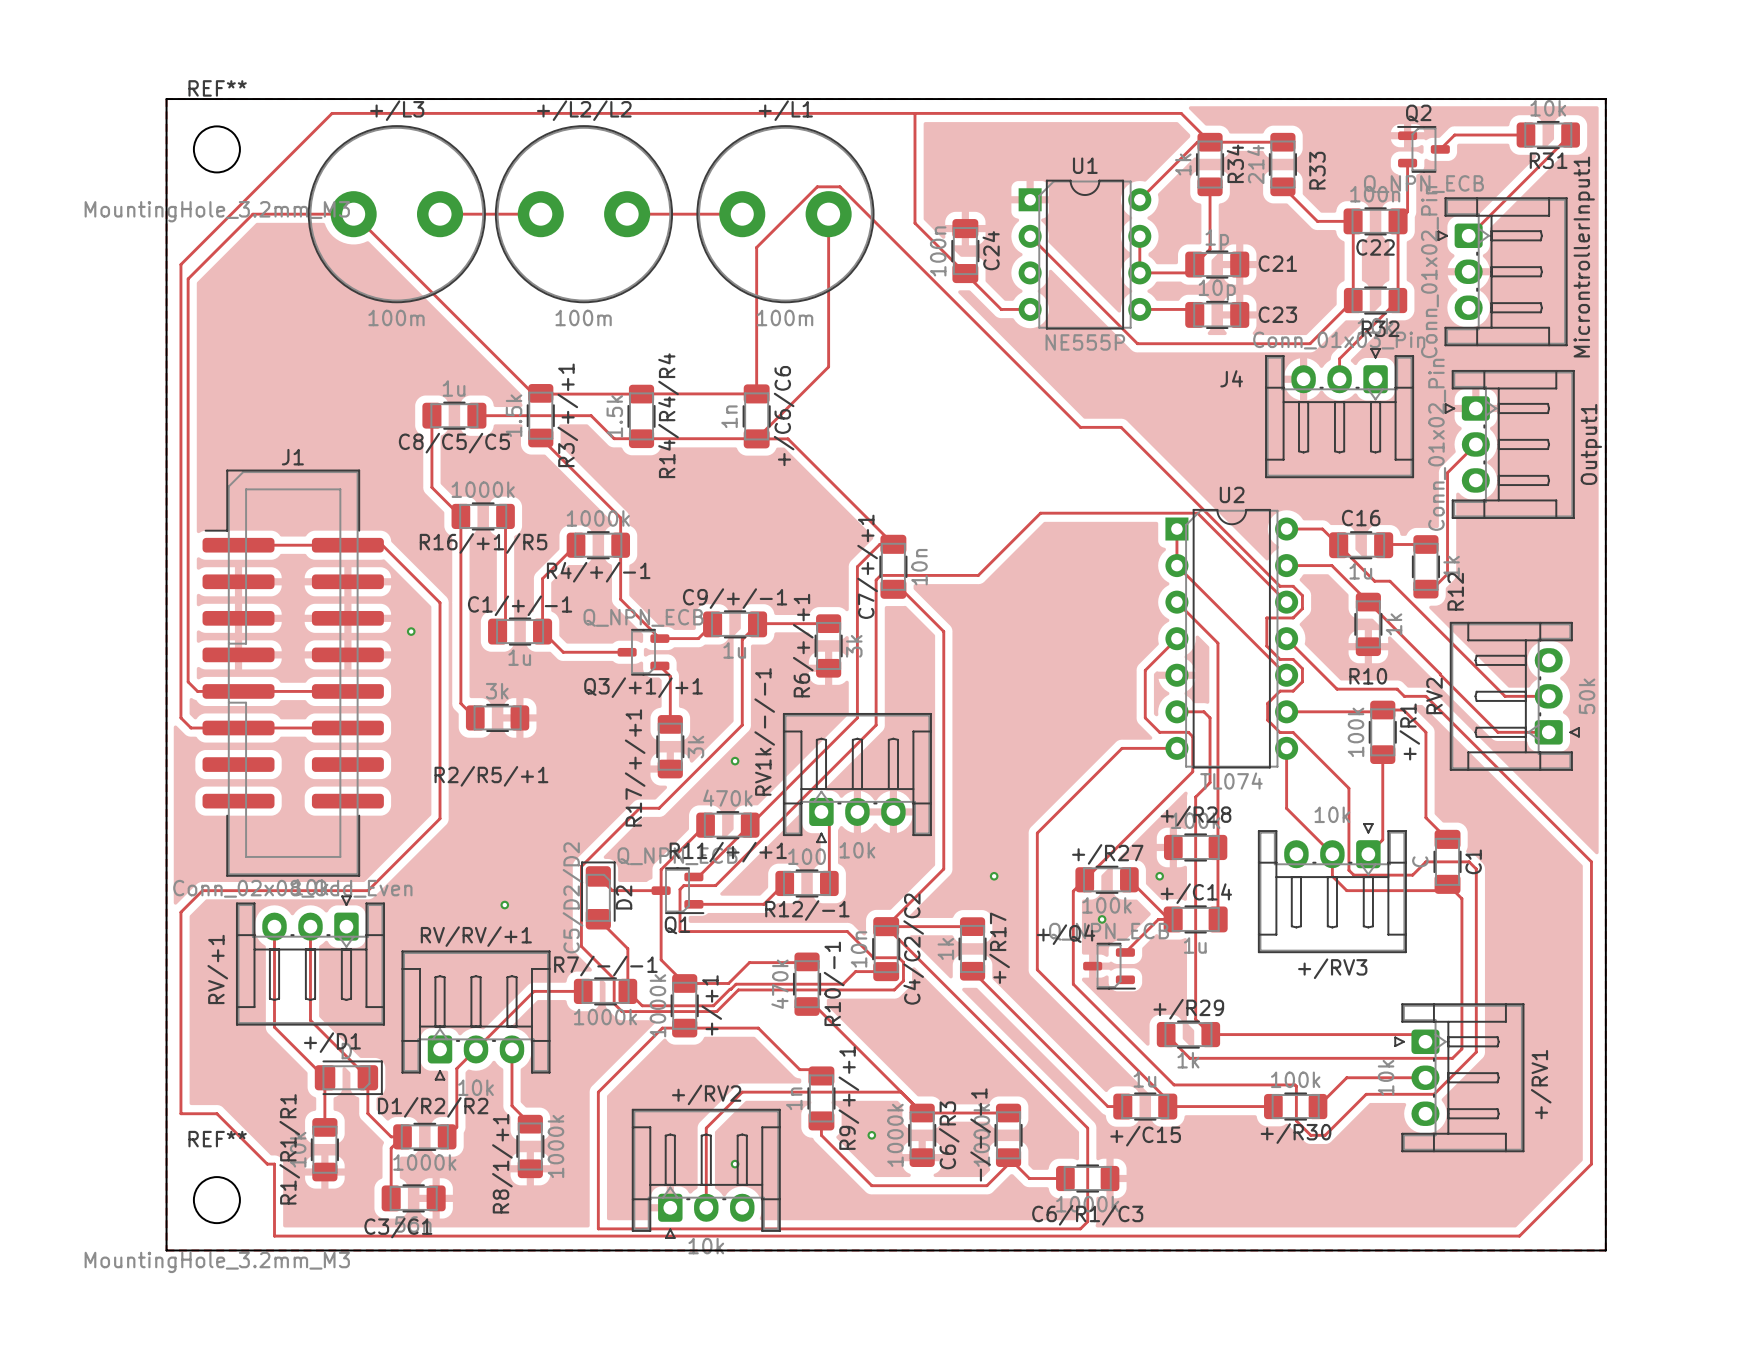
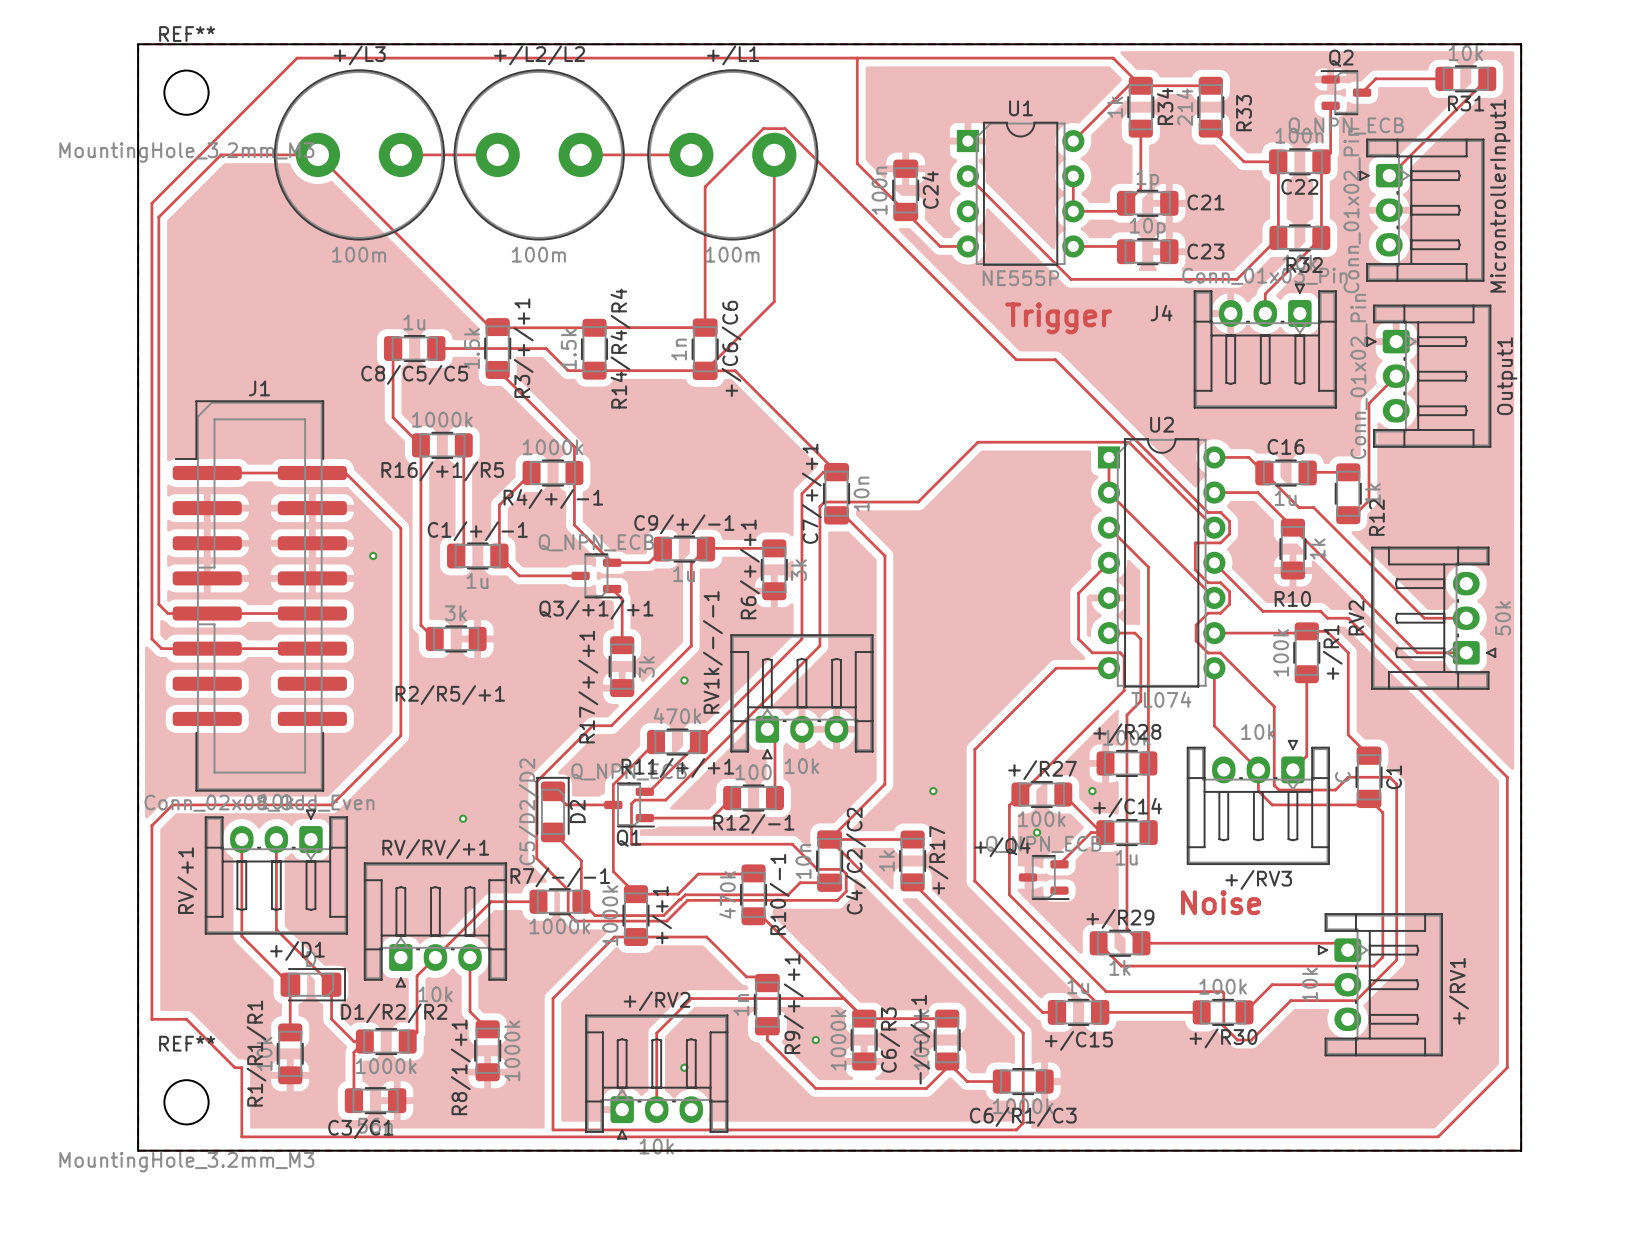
text: none -> Trigger (1058, 318)
text: none -> Noise (1221, 902)

